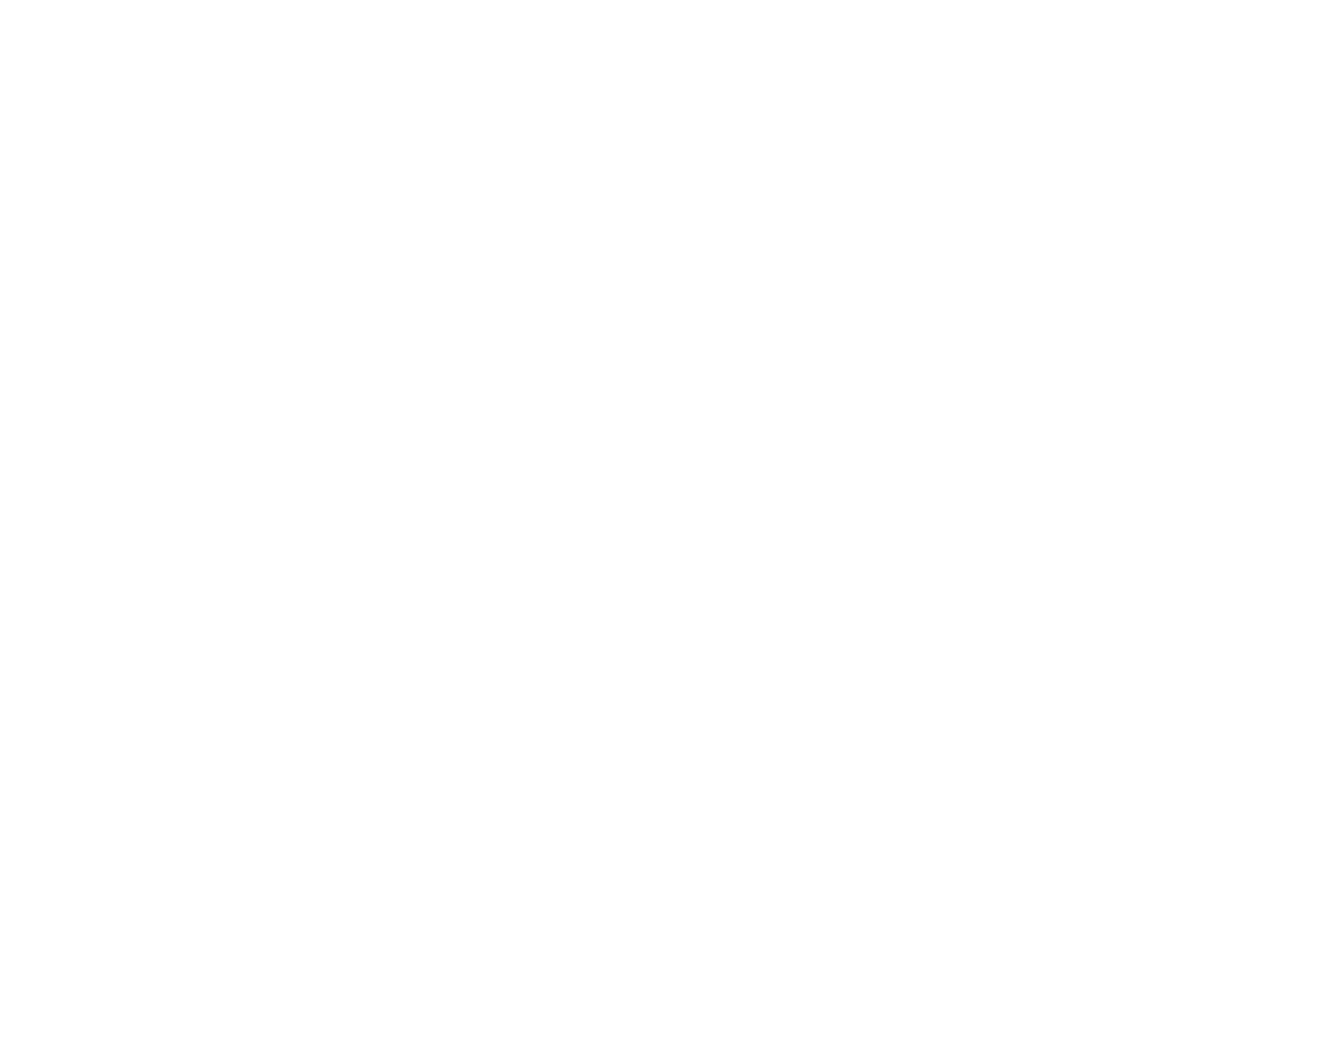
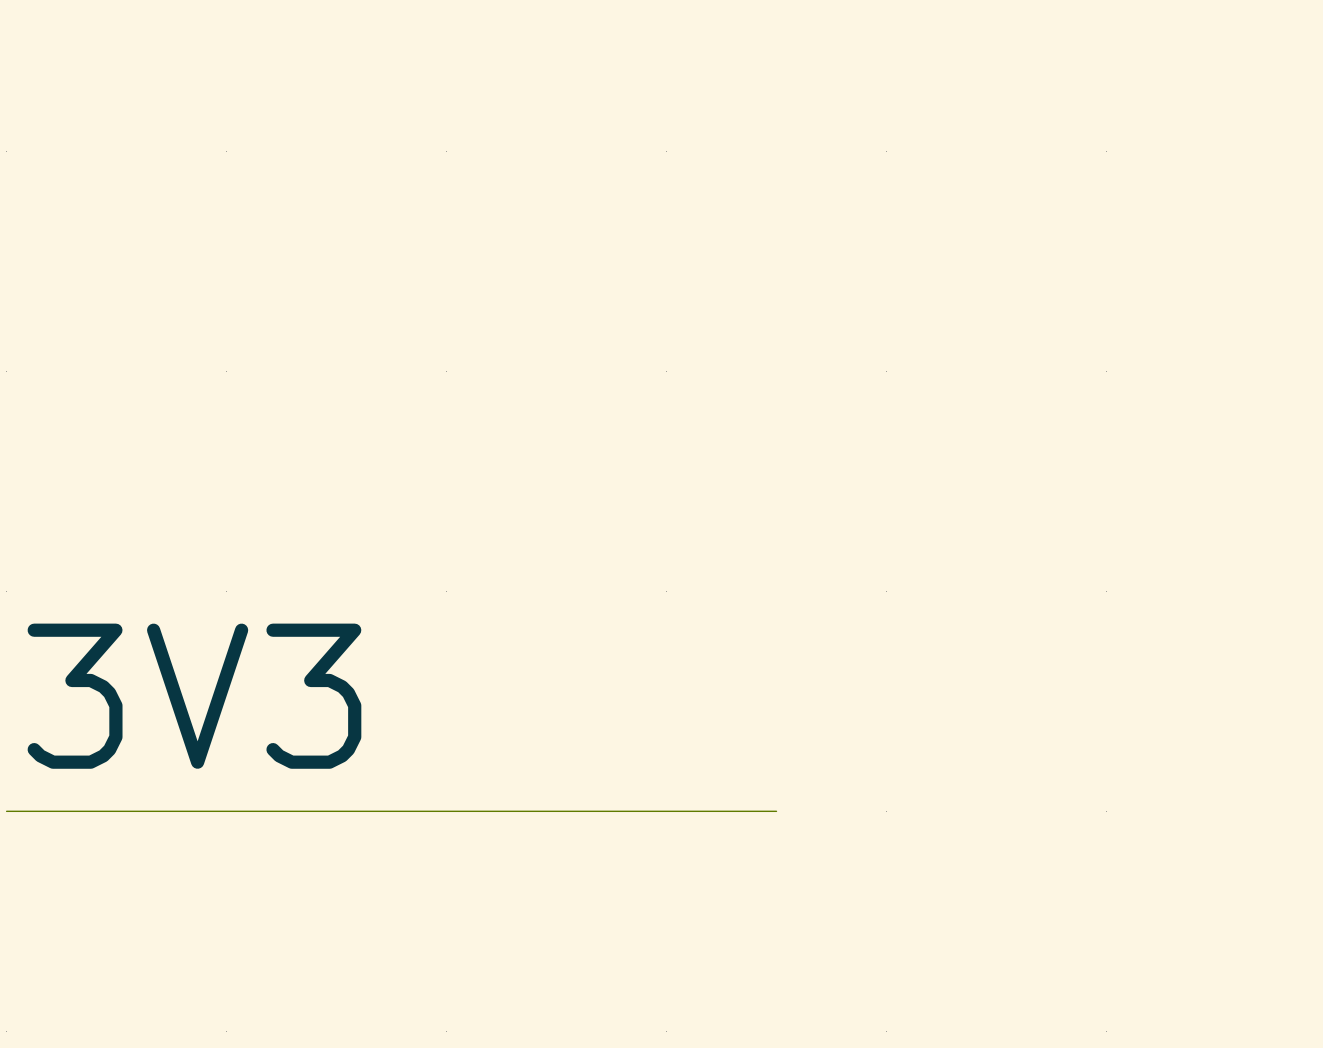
label: none -> 3V3 (194, 696)
wire: none -> (6, 811) (776, 811)

